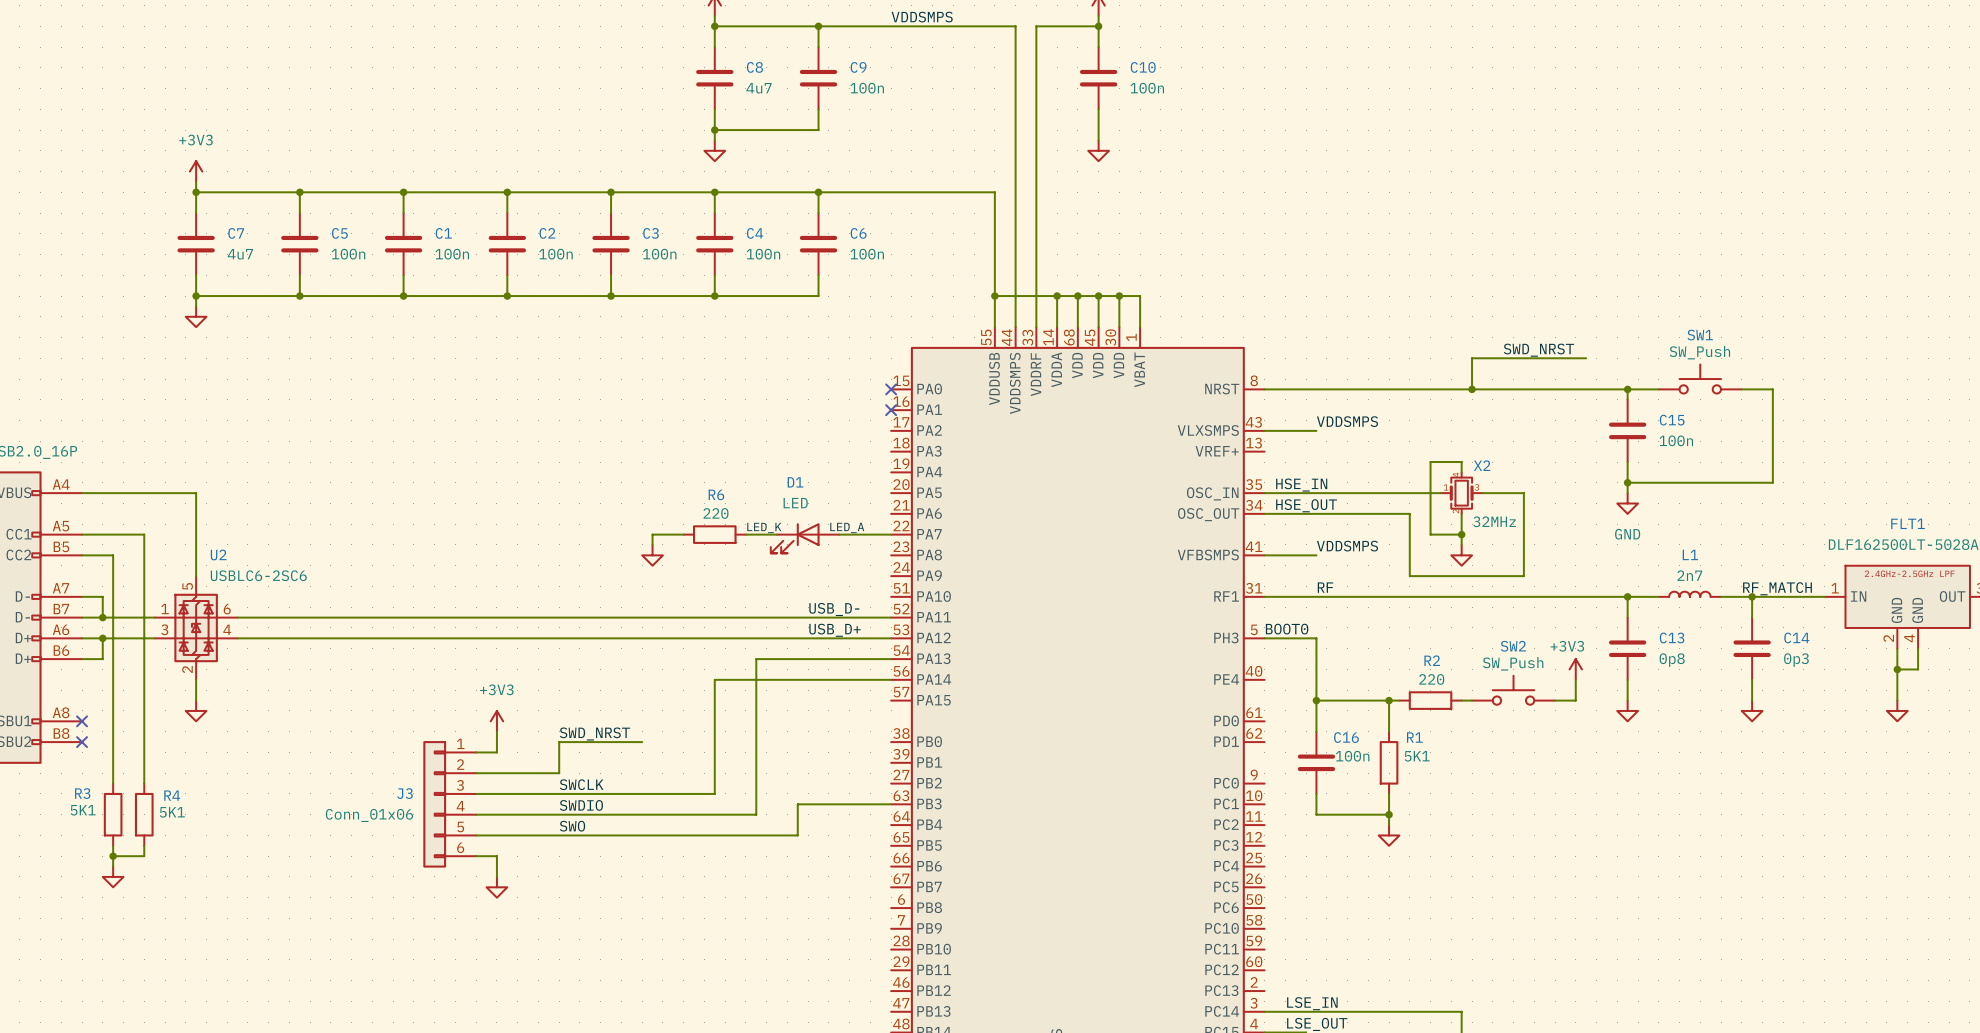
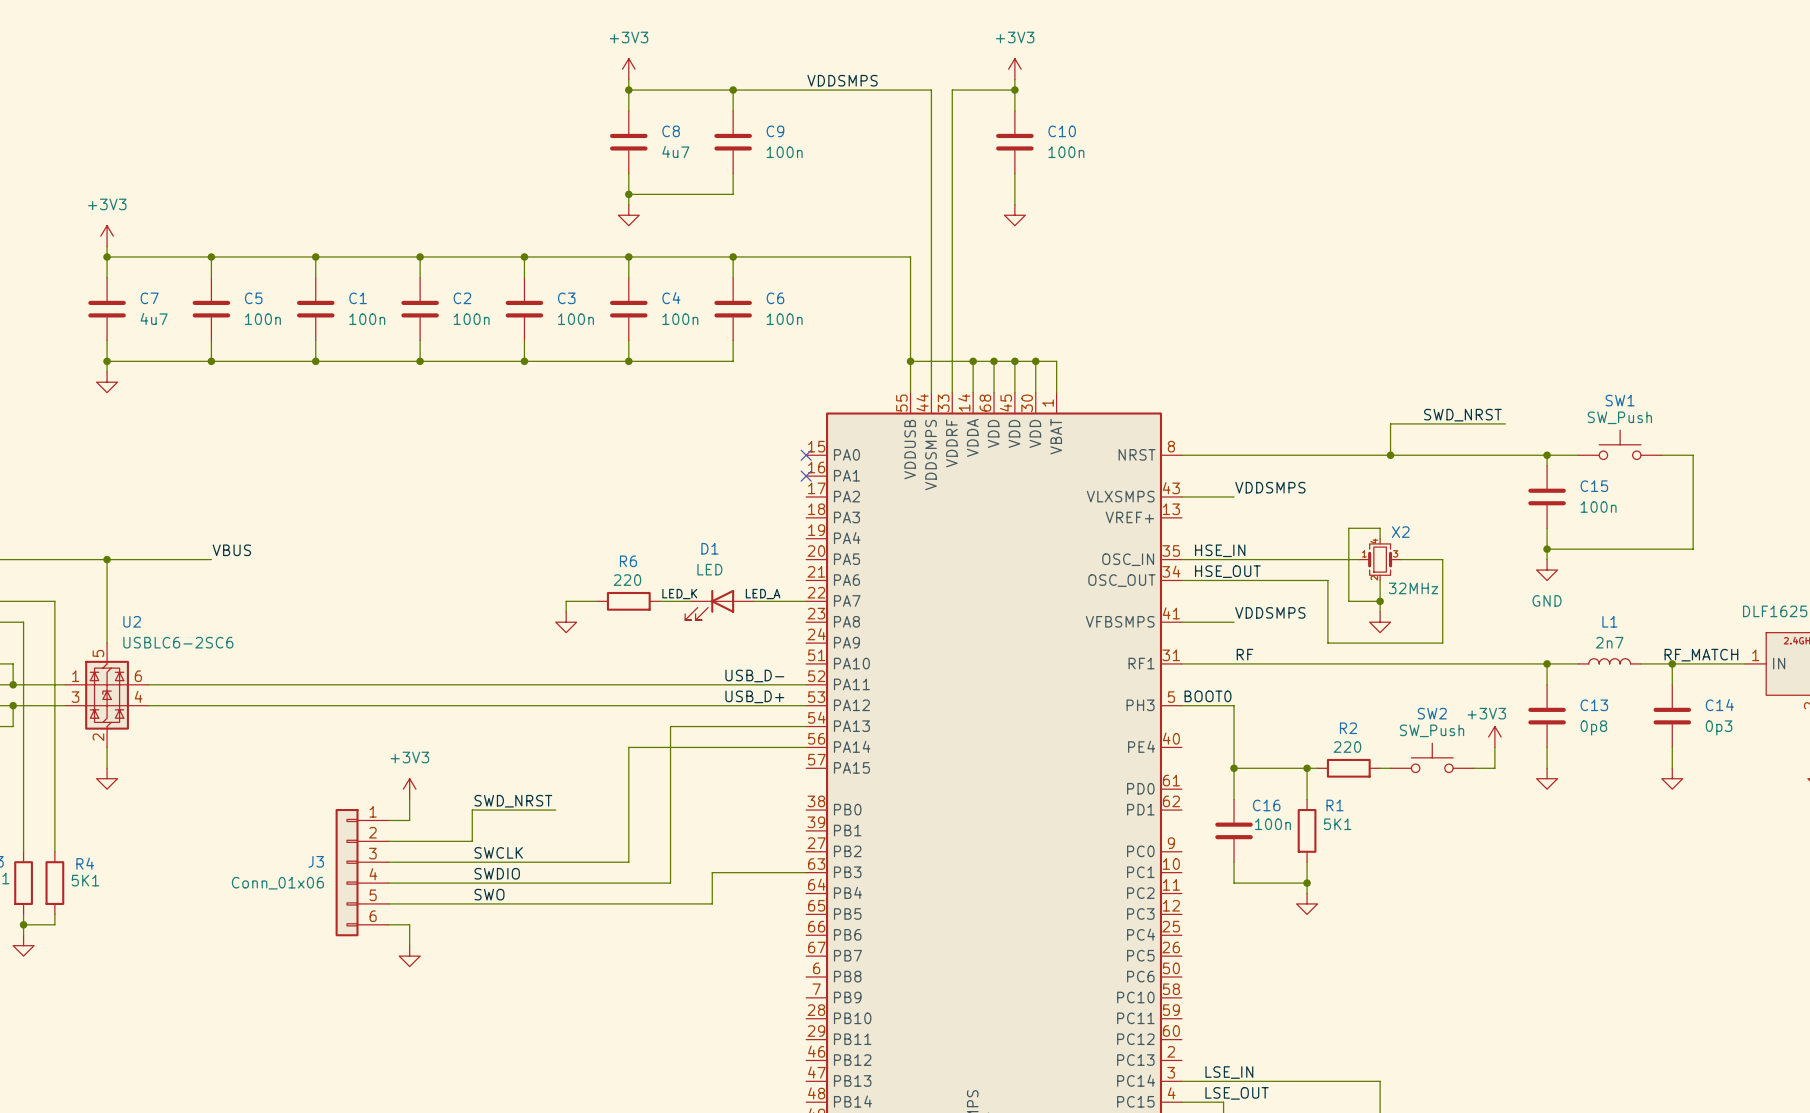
label: none -> VBUS (231, 550)
wire: none -> (107, 559) (211, 559)
junction: none -> (107, 559)

